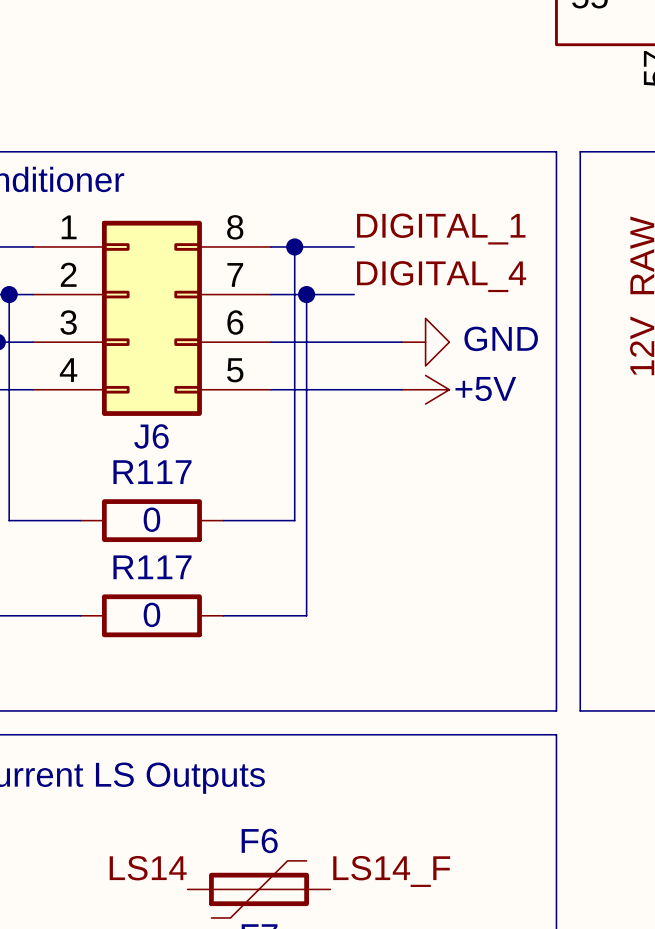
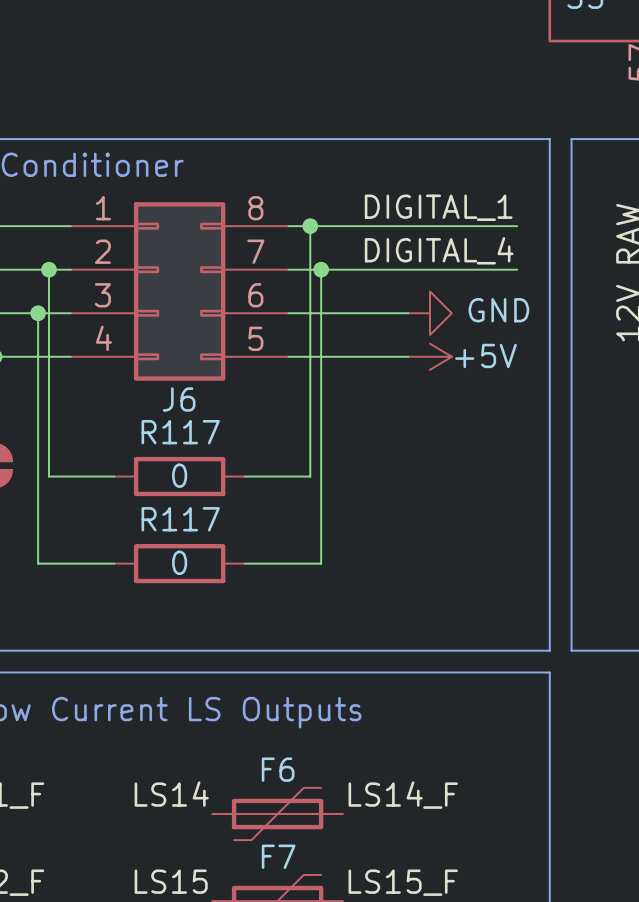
label position: DIGITAL_1 (441, 229) -> DIGITAL_1 (438, 207)
wire: none -> (364, 226) (517, 226)
label position: DIGITAL_4 (441, 276) -> DIGITAL_4 (439, 250)
wire: none -> (364, 269) (517, 269)

